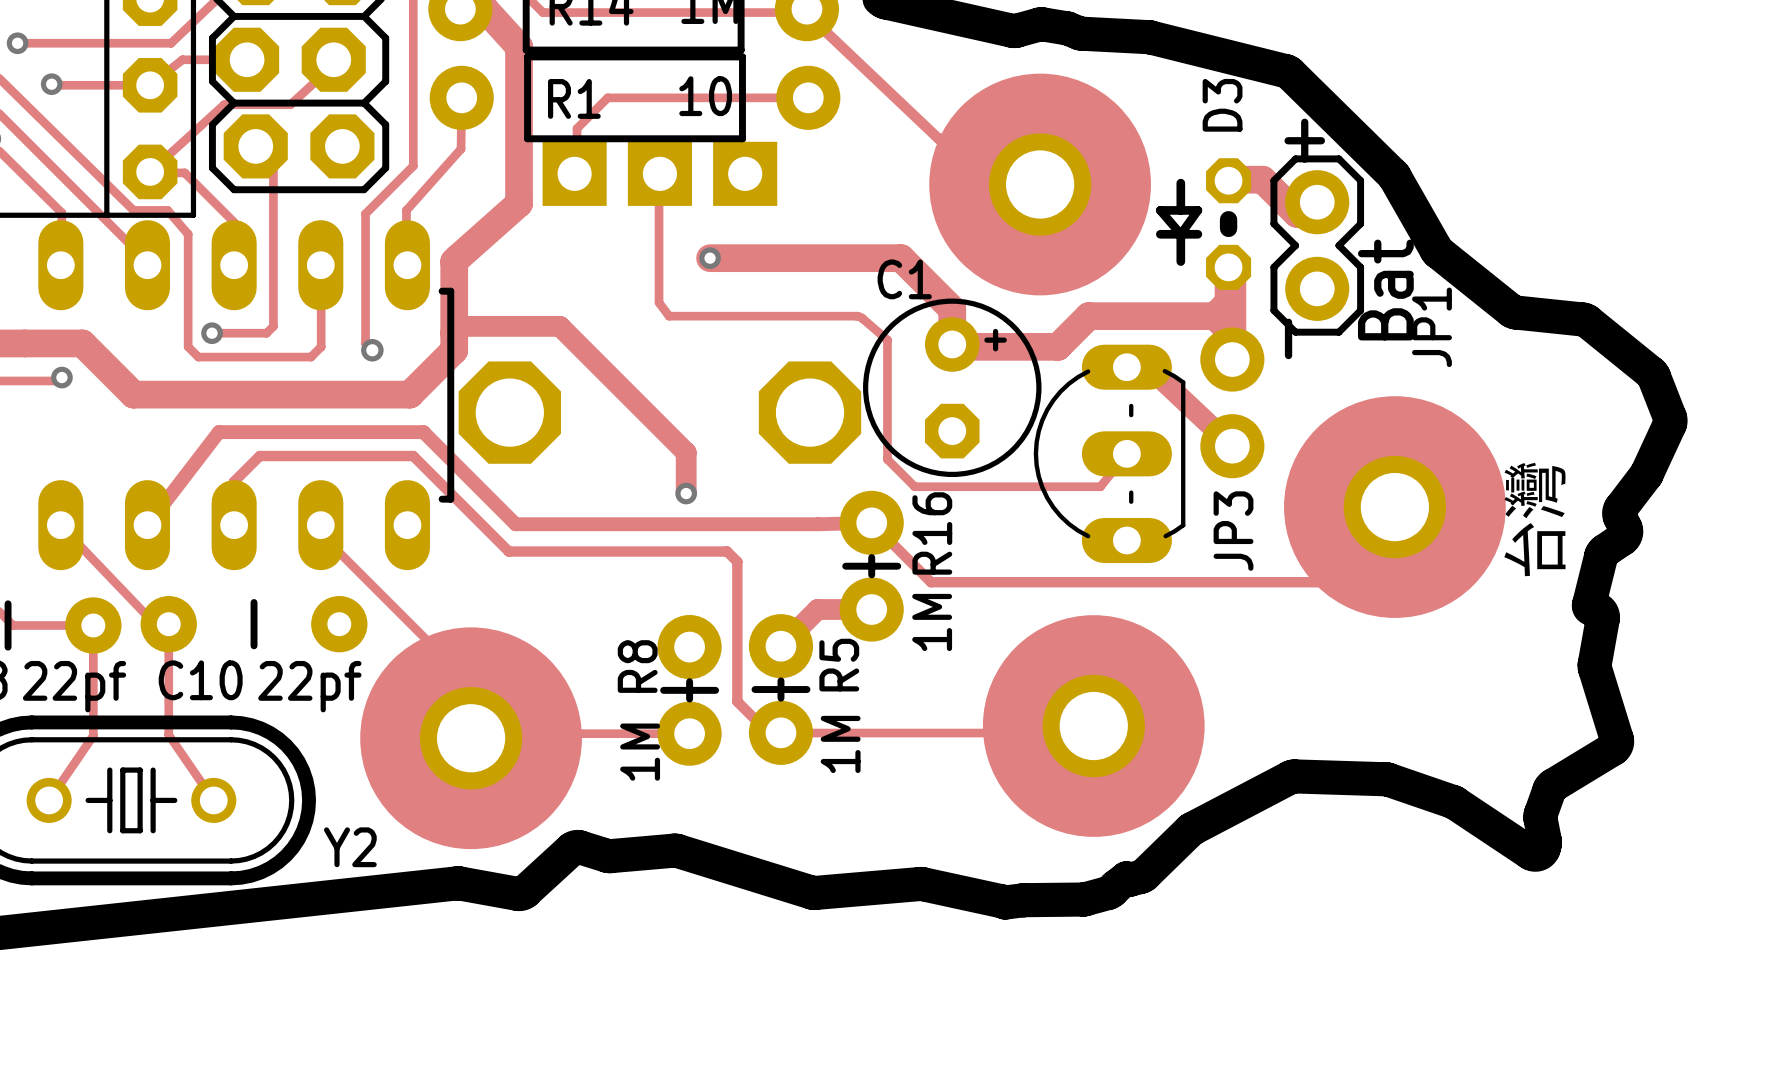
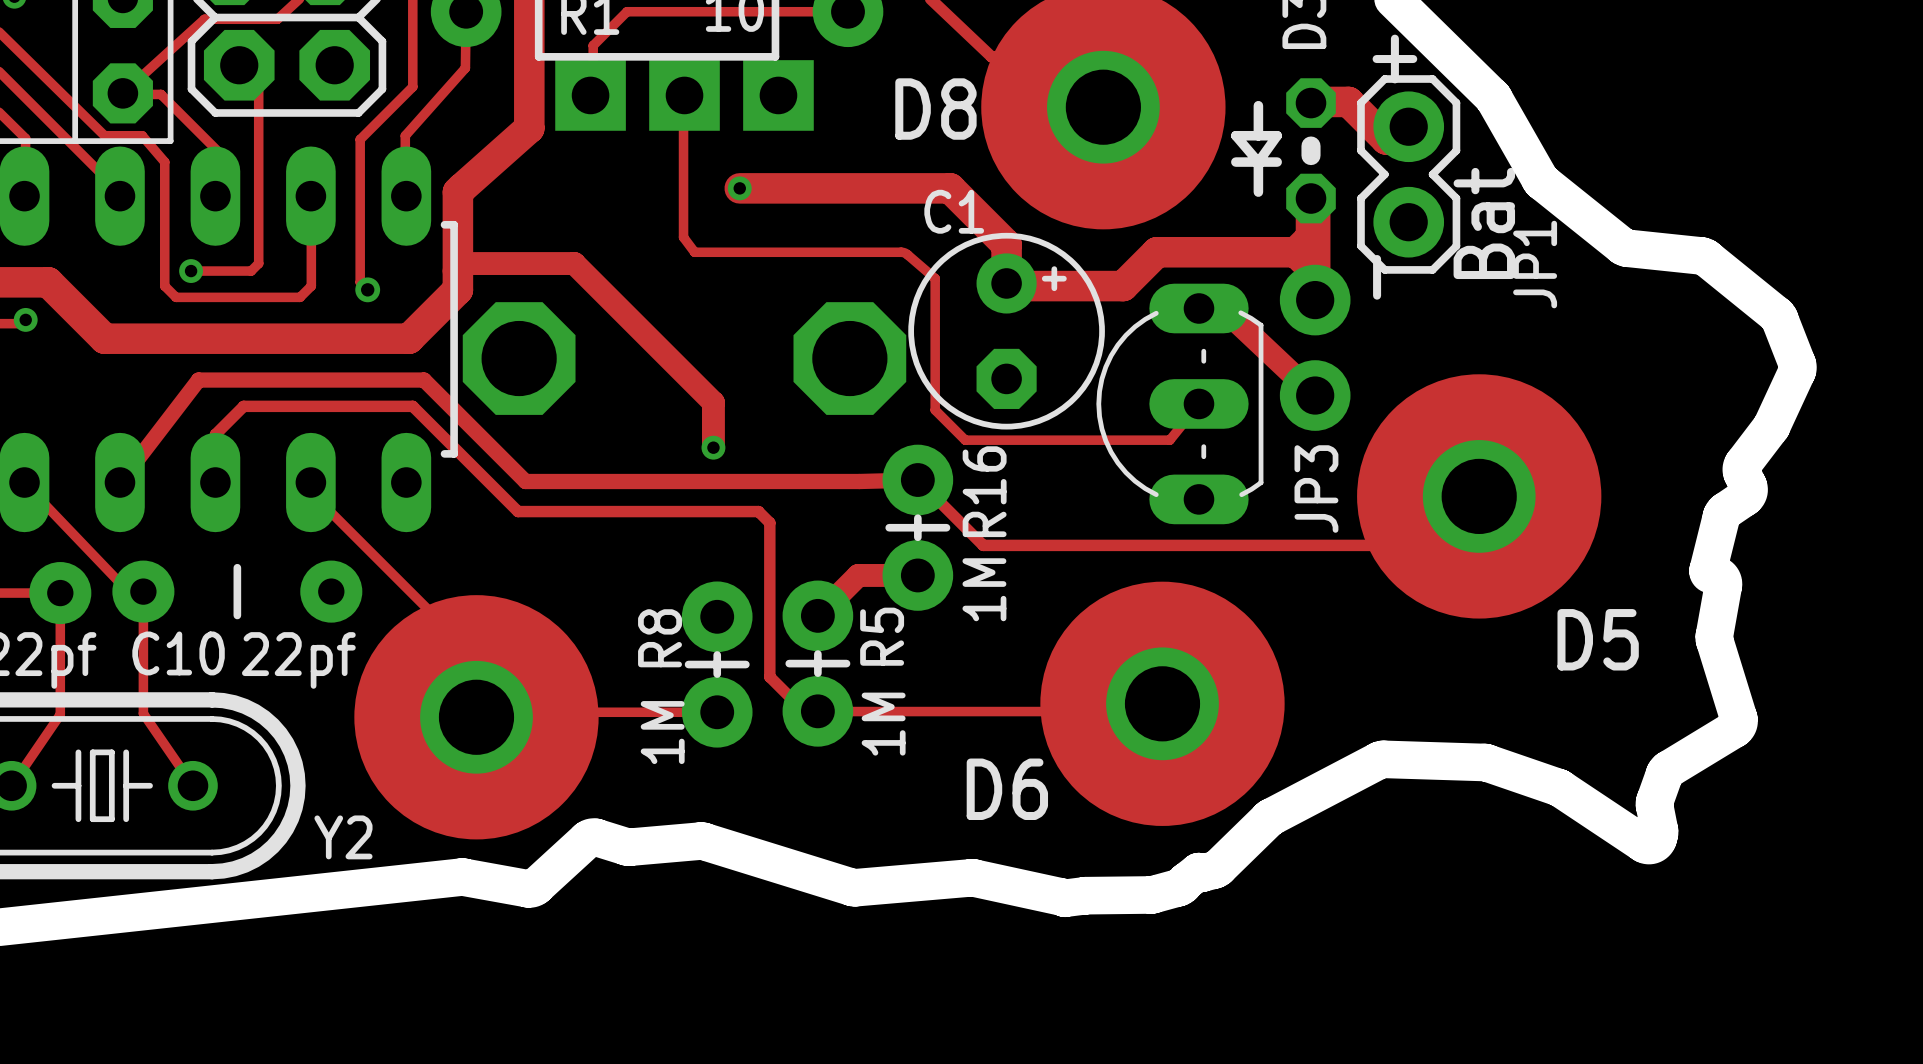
text: none -> D8 (935, 109)
part position: (1394, 507) -> (1479, 496)
text: 台灣 (1534, 519) -> none
text: none -> D5 (1598, 639)
text: none -> D6 (1007, 789)

